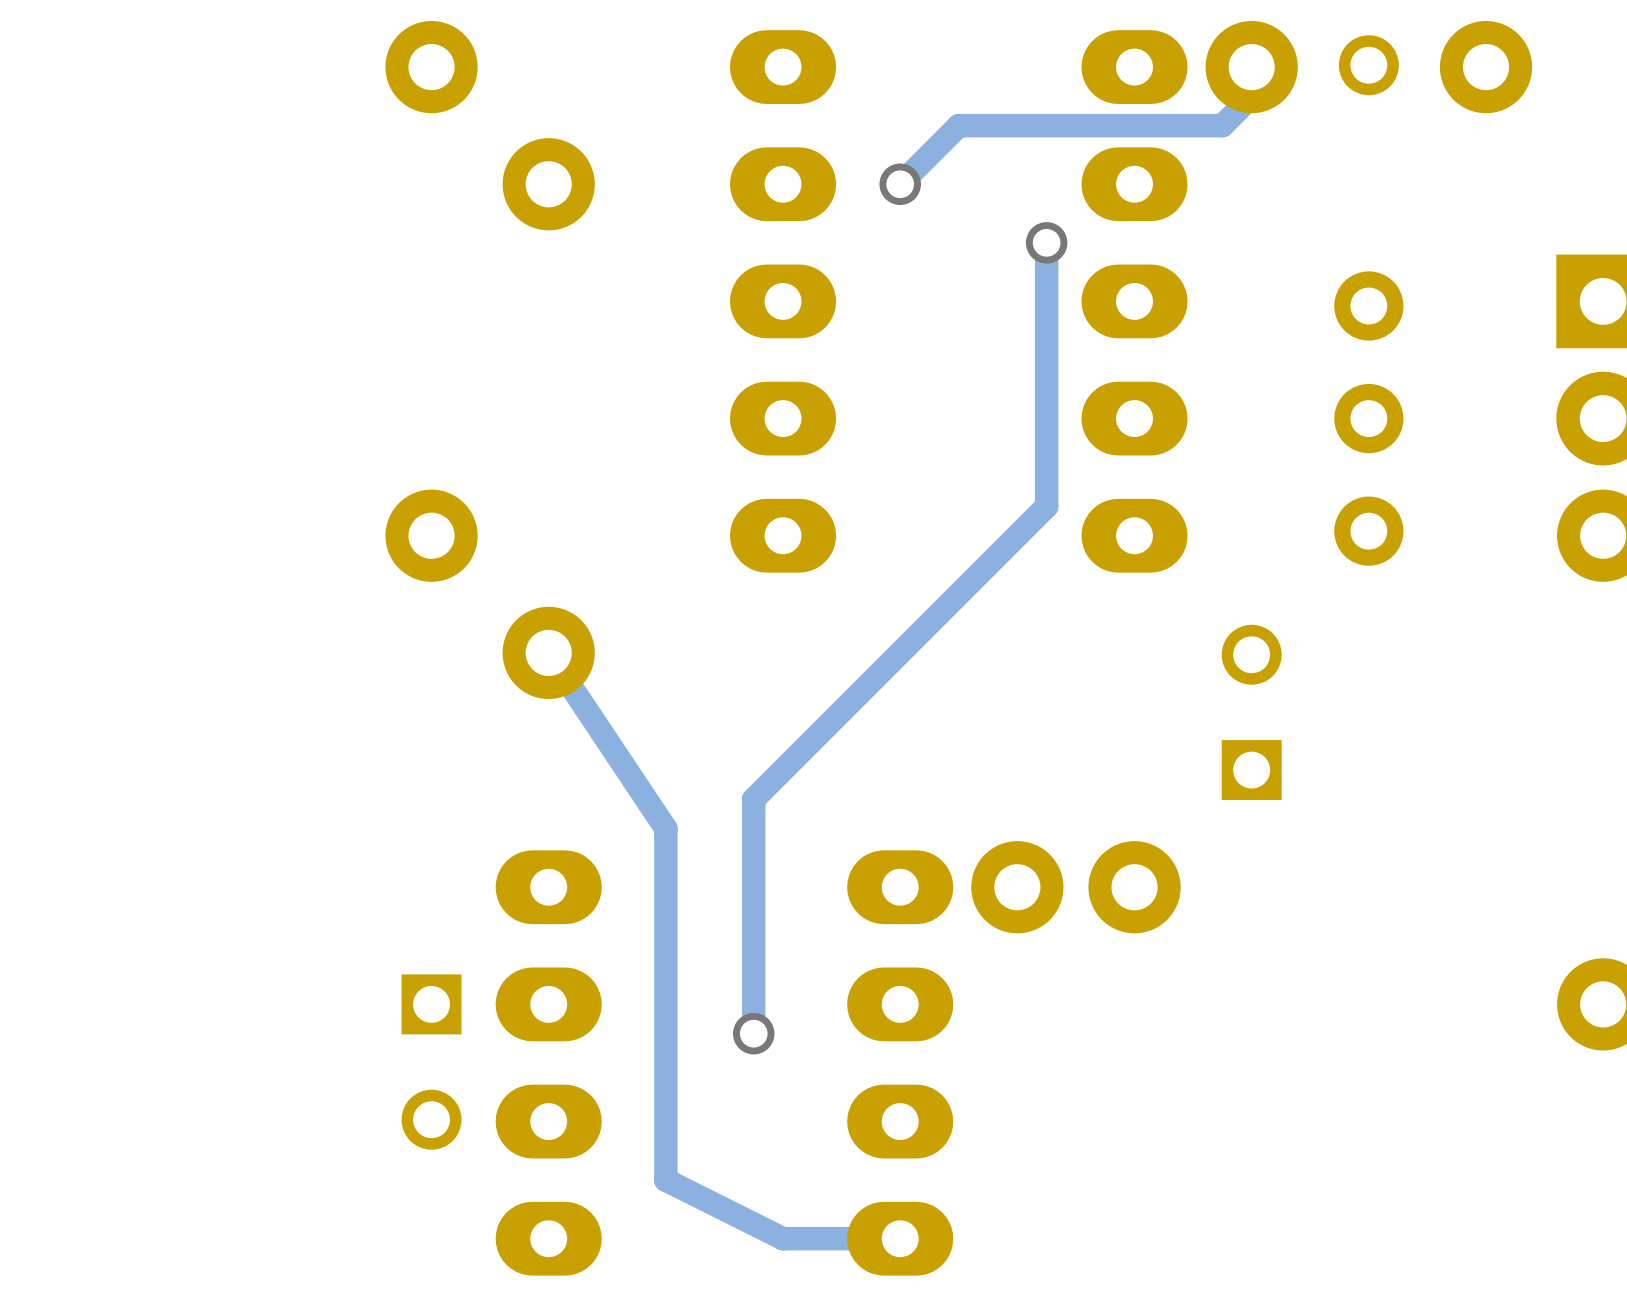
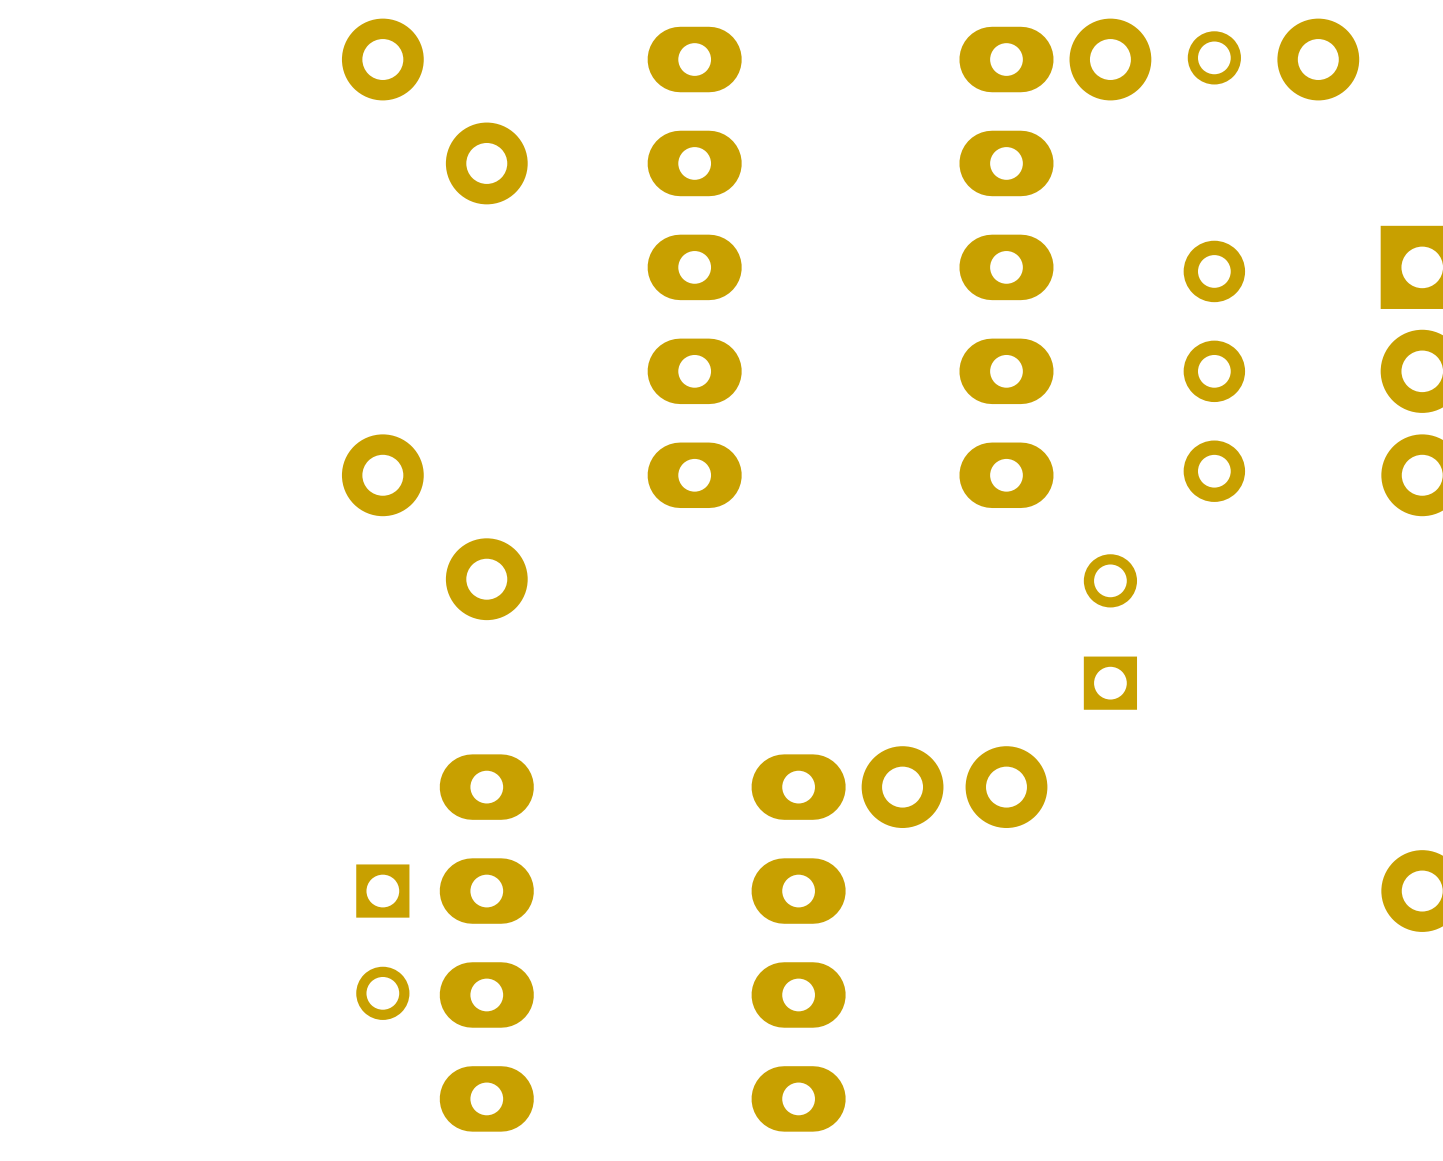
track: (1251, 67) (1251, 96) (1222, 125) (958, 125) (900, 184) -> none
via: (900, 184) -> none
track: (1046, 242) (1046, 506) (753, 799) (753, 1033) -> none
via: (1046, 242) -> none
track: (548, 652) (665, 828) (665, 1180) (783, 1238) (900, 1238) -> none
via: (753, 1033) -> none

